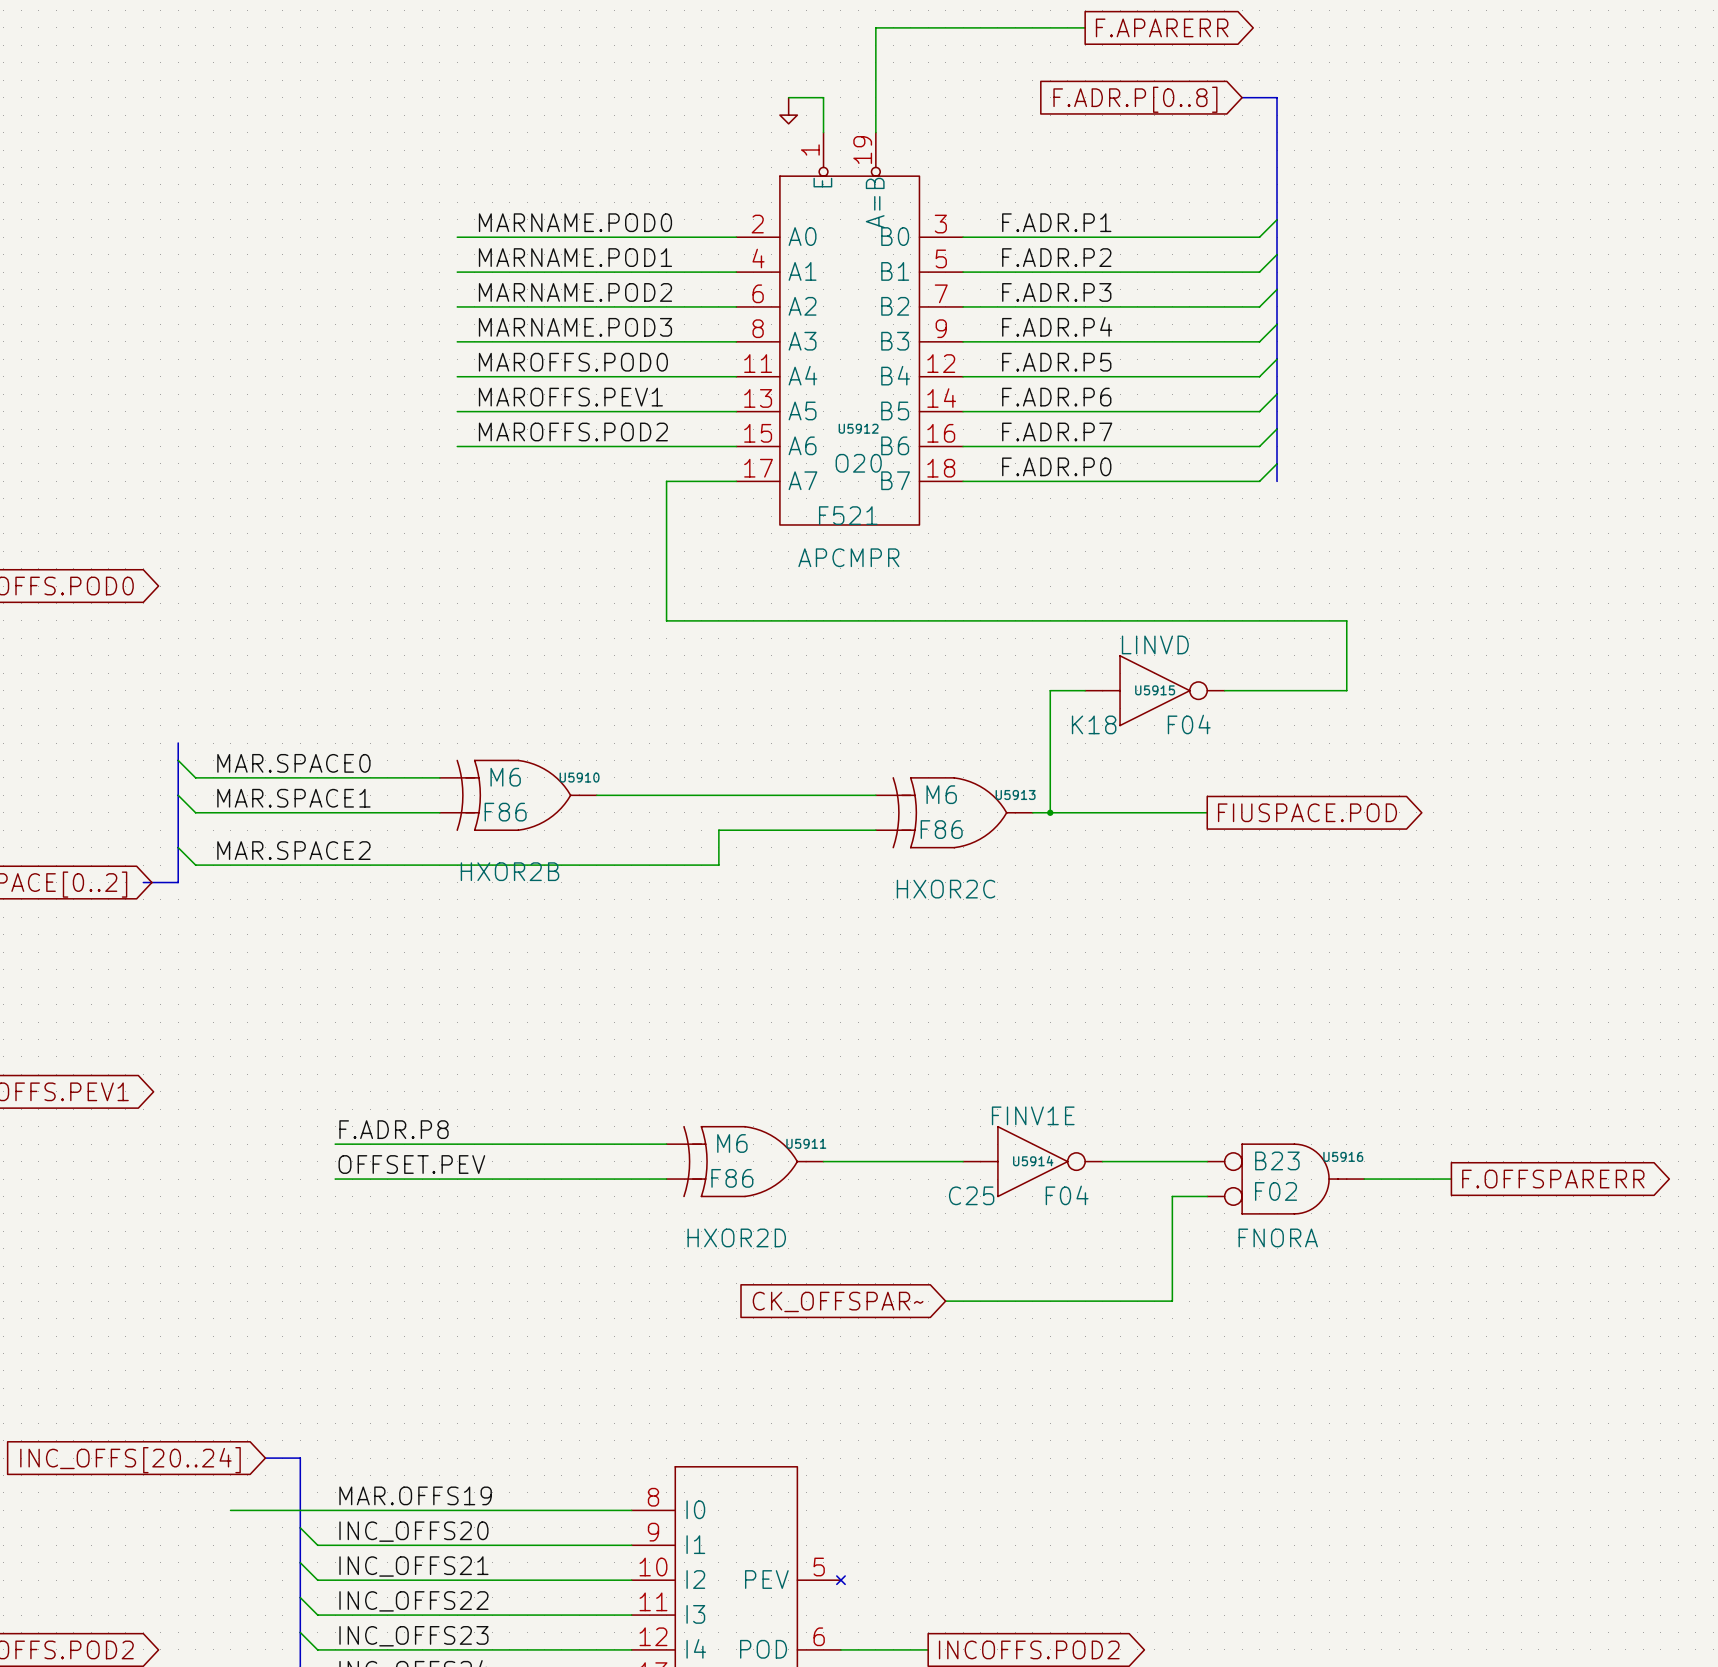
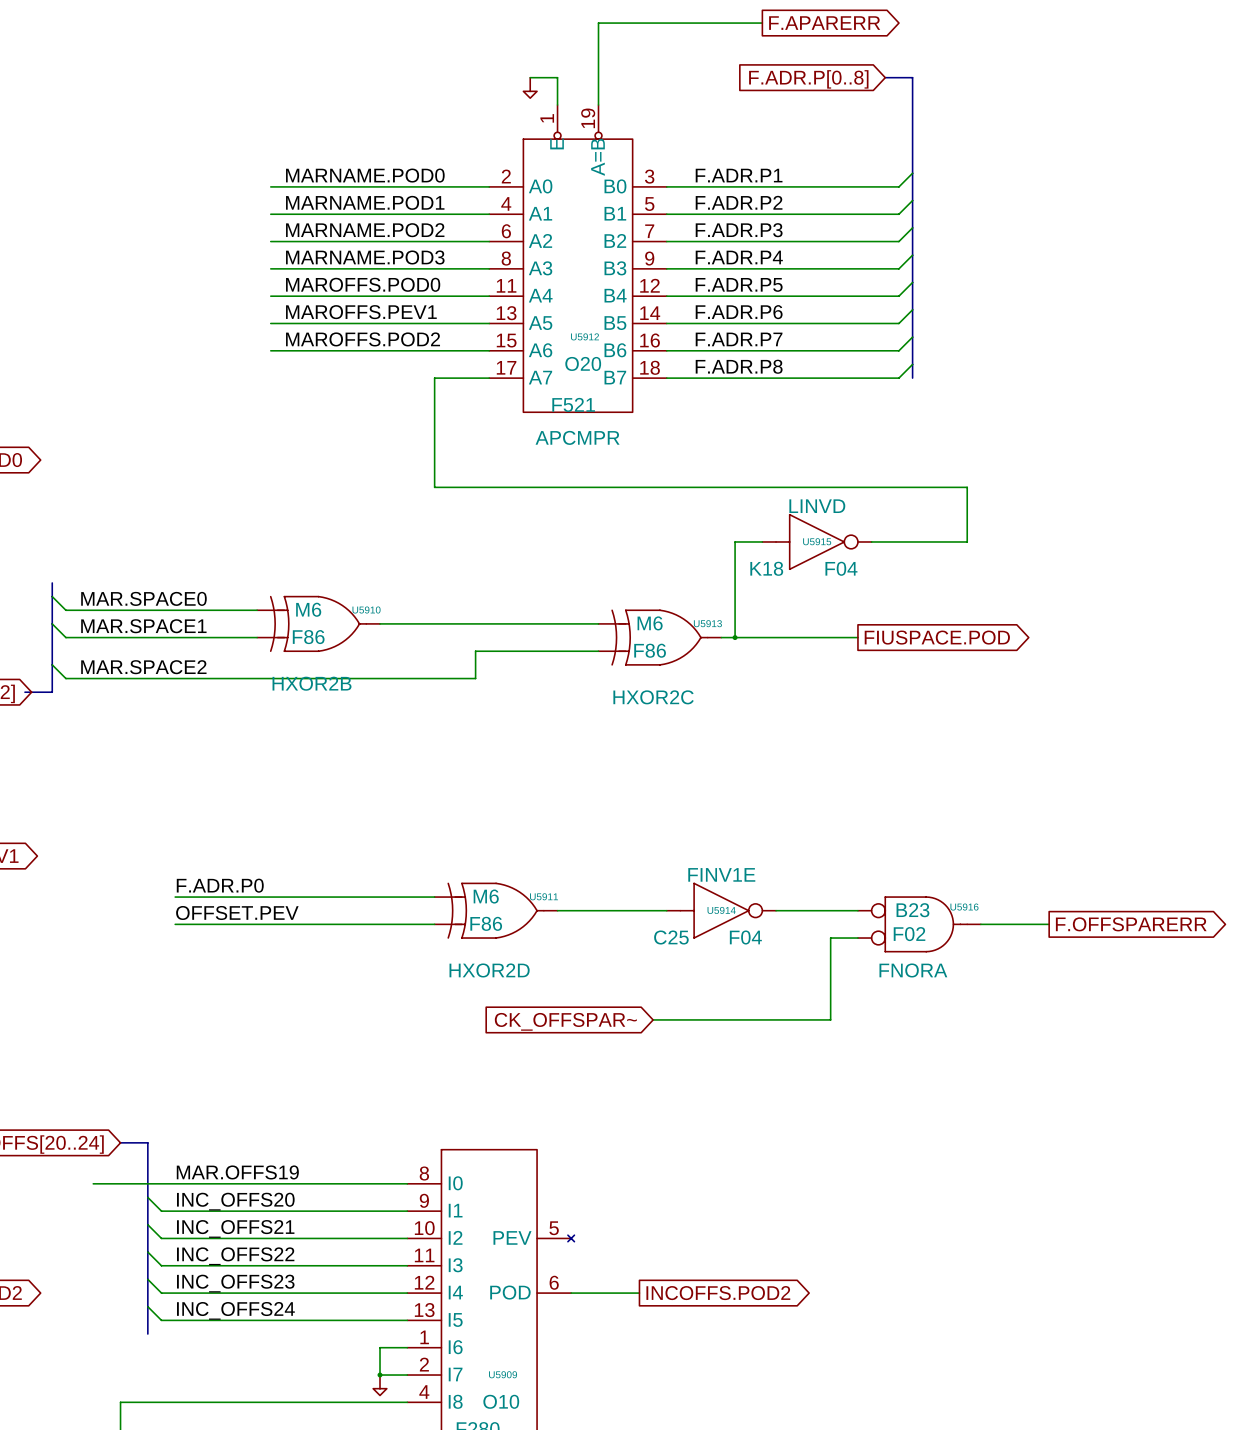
label: F.ADR.P0 (1056, 466) -> F.ADR.P8 (739, 366)
label: F.ADR.P8 (394, 1129) -> F.ADR.P0 (220, 885)

